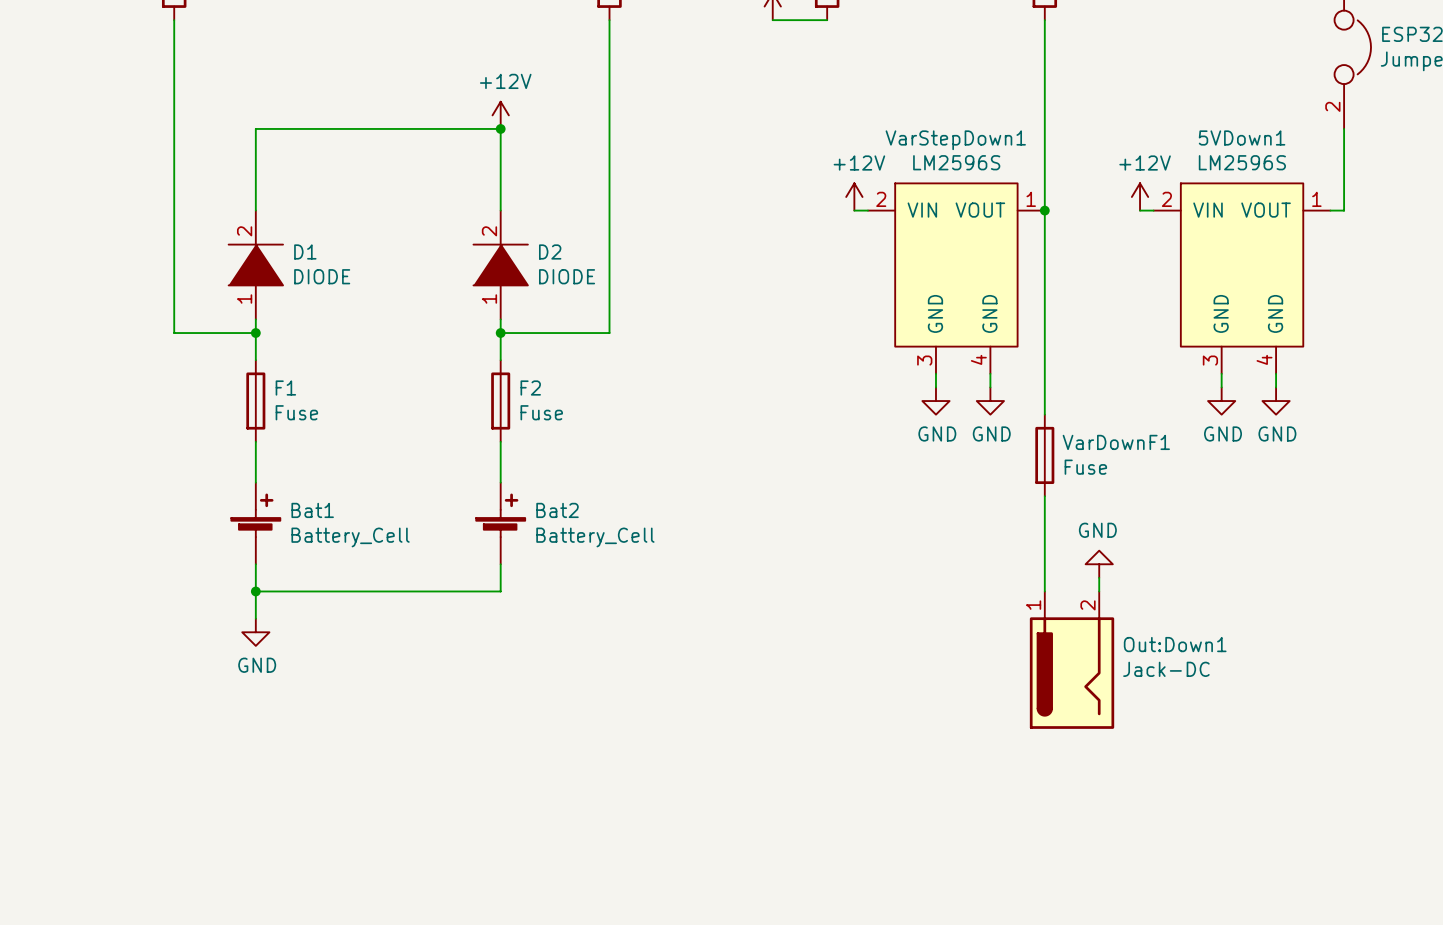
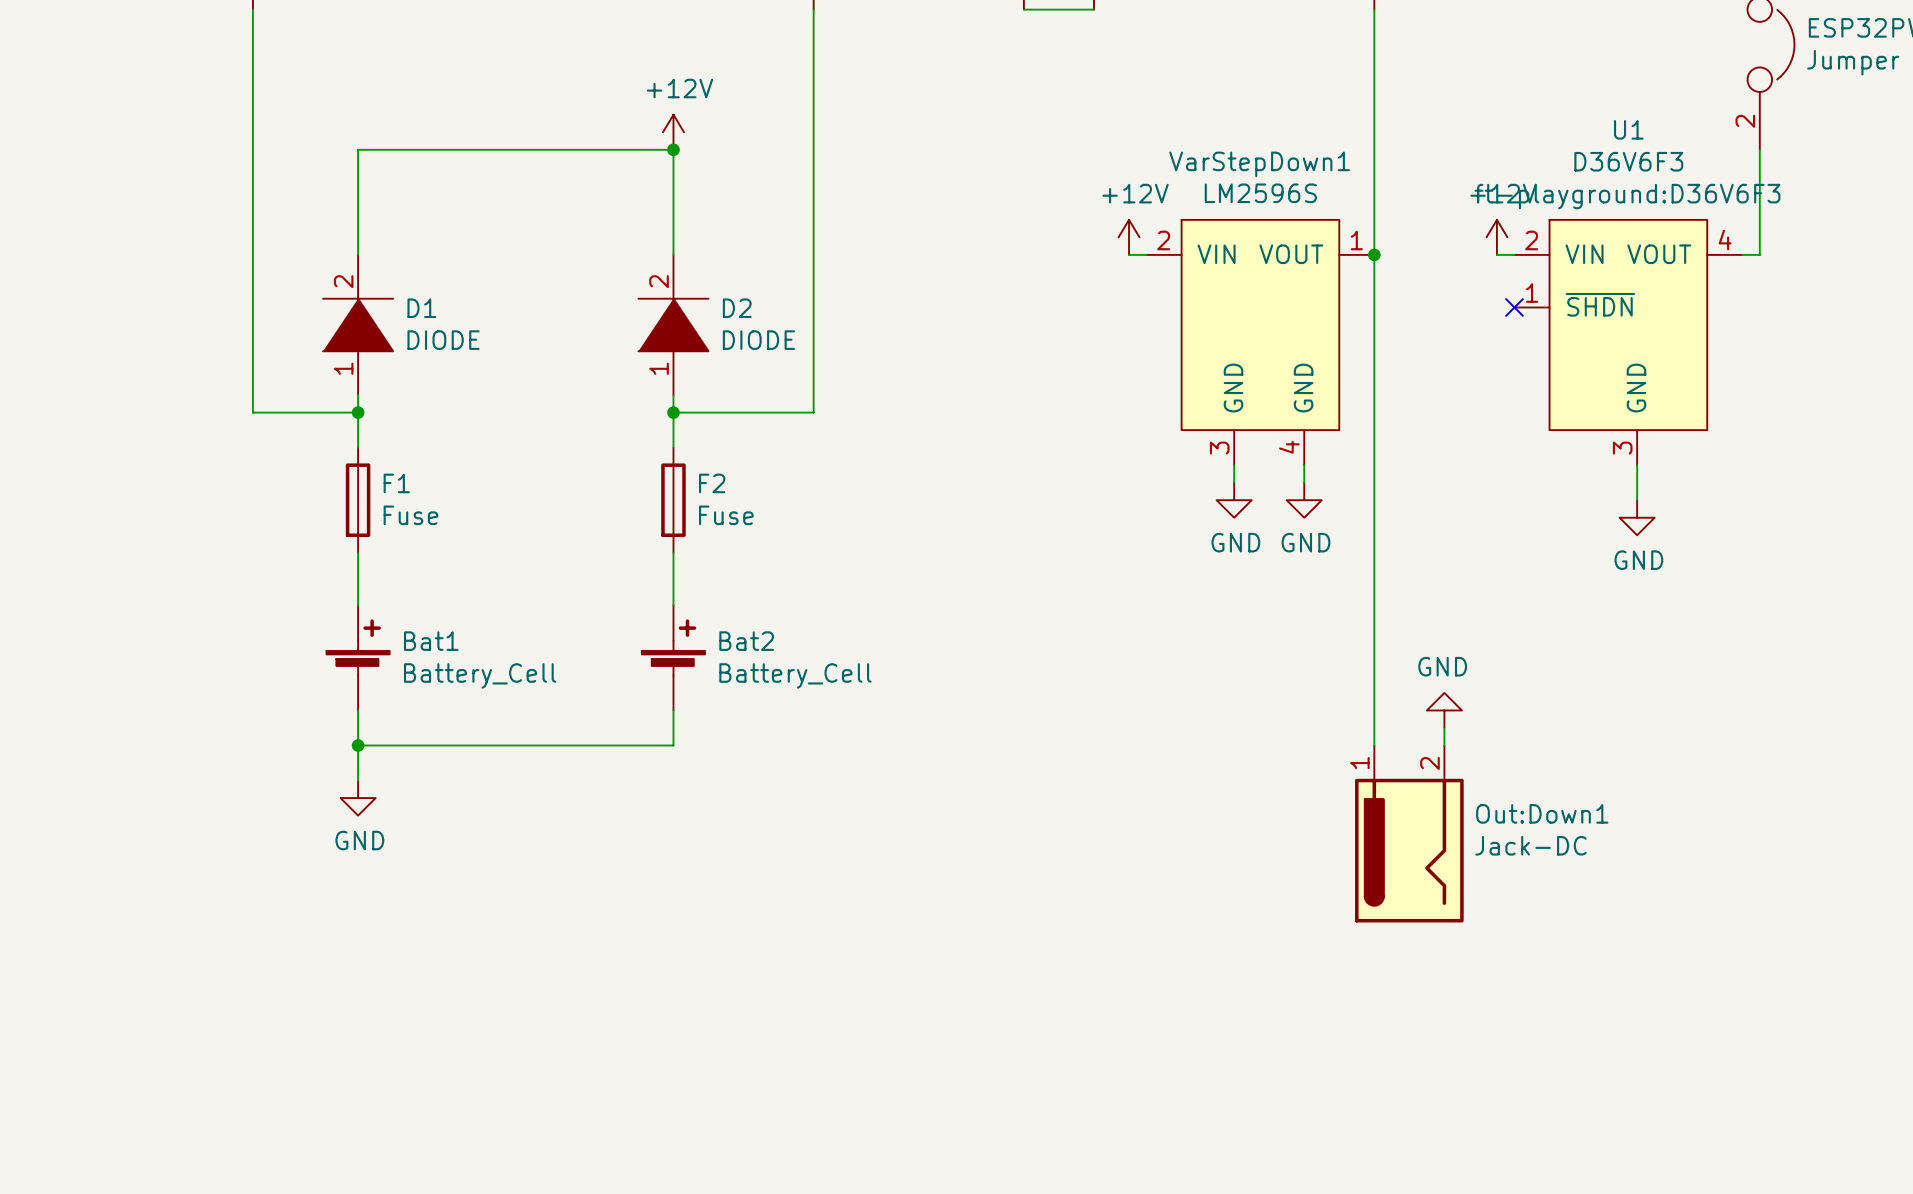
no-connect mark: none -> (1514, 307)
5VDown1: LM2596S (1242, 278) -> none
U1: none -> D36V6F3 (1628, 342)
wire: (1221, 373) (1221, 387) -> none
wire: none -> (1637, 465) (1637, 500)
wire: (1276, 373) (1276, 387) -> none
power symbol: GND (1221, 401) -> none
power symbol: GND (1276, 401) -> none
power symbol: none -> GND (1637, 517)
VarDownF1: Fuse (1044, 455) -> none

